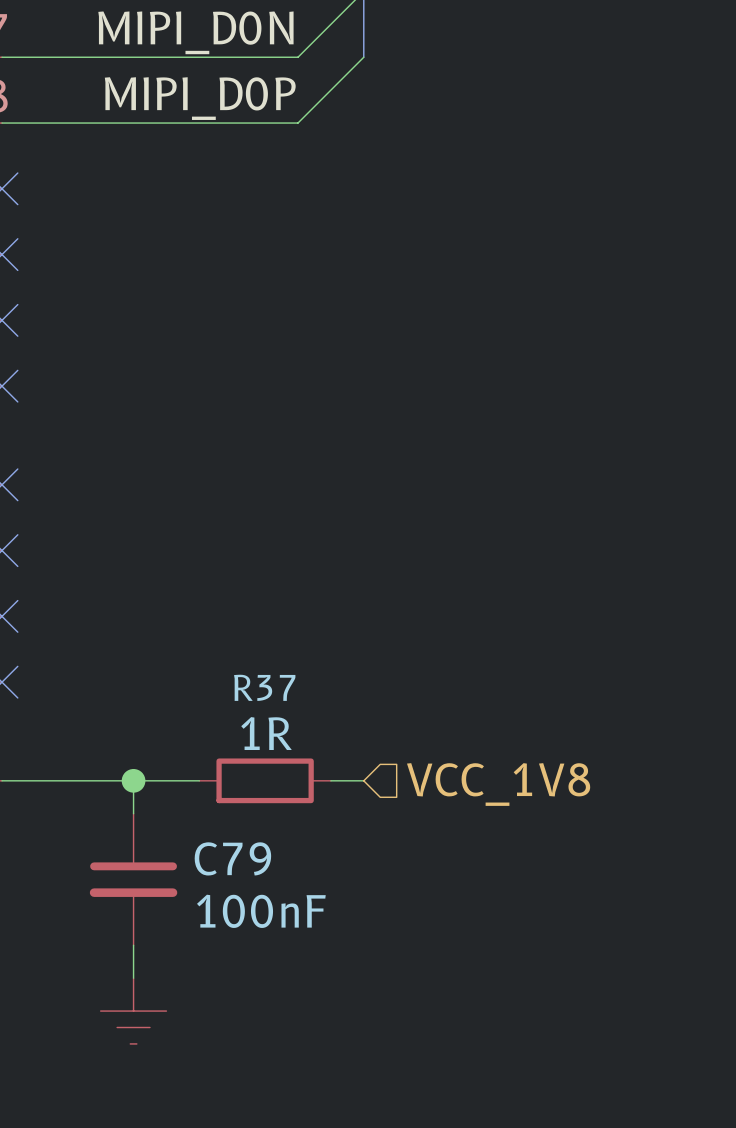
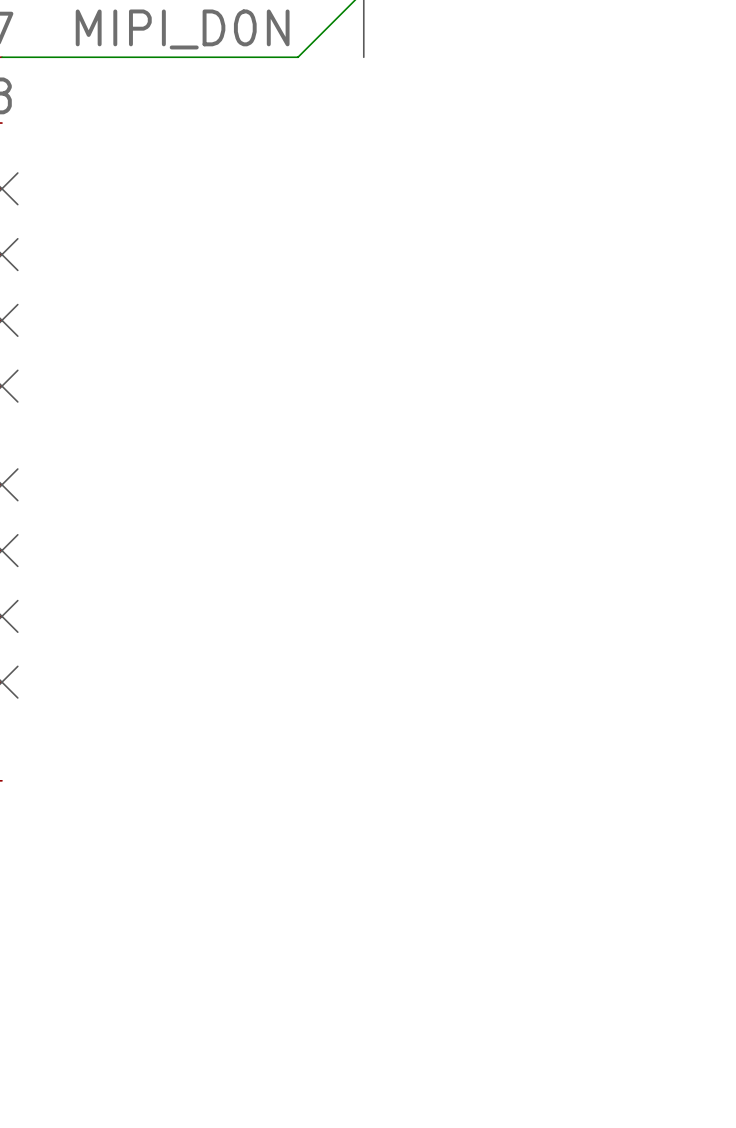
wire: (363, 57) (298, 123) (2, 123) -> none
label: MIPI_D0P (200, 98) -> none
wire: (2, 780) (199, 780) -> none
wire: (133, 780) (133, 813) -> none
junction: (133, 780) -> none
R37: 1R (265, 780) -> none
wire: (330, 780) (363, 780) -> none
hierarchical label: VCC_1V8 (498, 784) -> none
C79: 100nF (133, 879) -> none
wire: (133, 945) (133, 978) -> none
power symbol: (133, 1011) -> none

